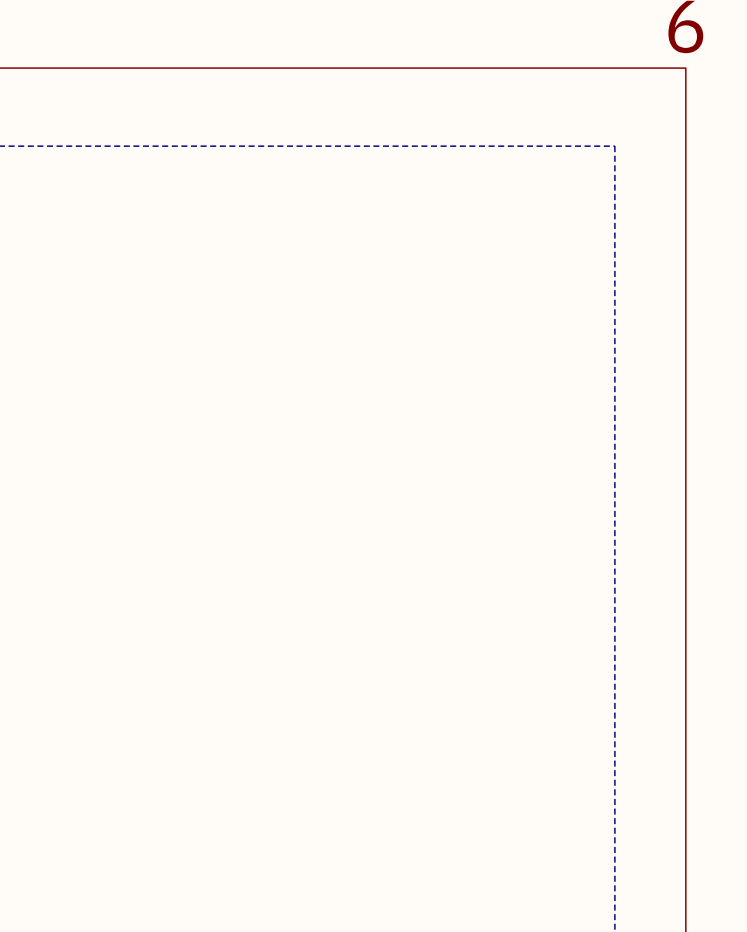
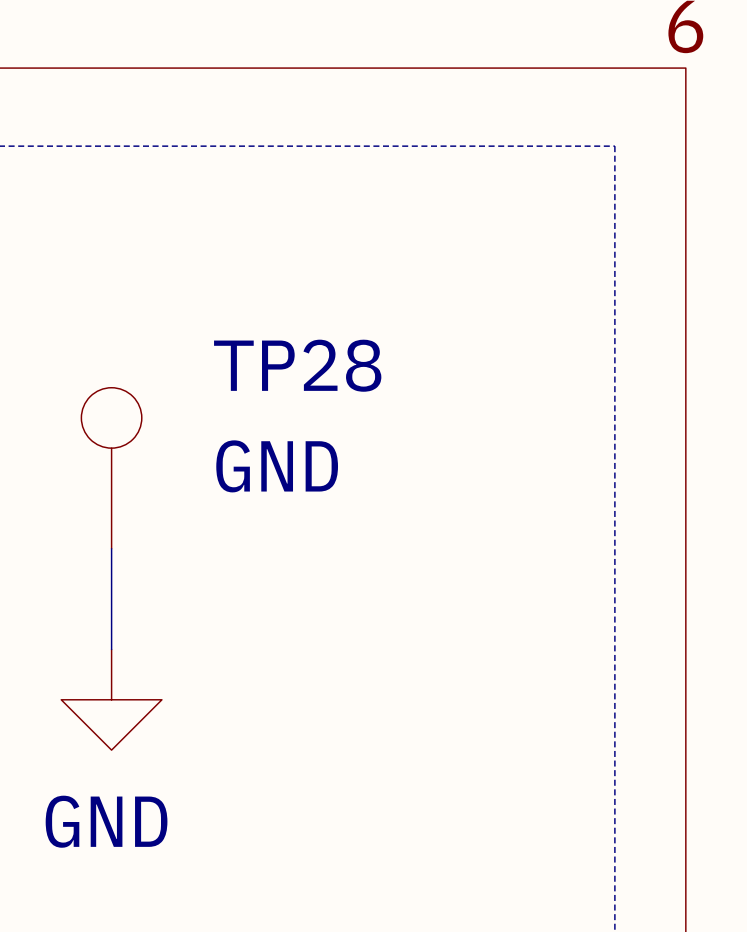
TP28: none -> GND (111, 468)
wire: none -> (111, 548) (111, 649)
power symbol: none -> GND (111, 699)

